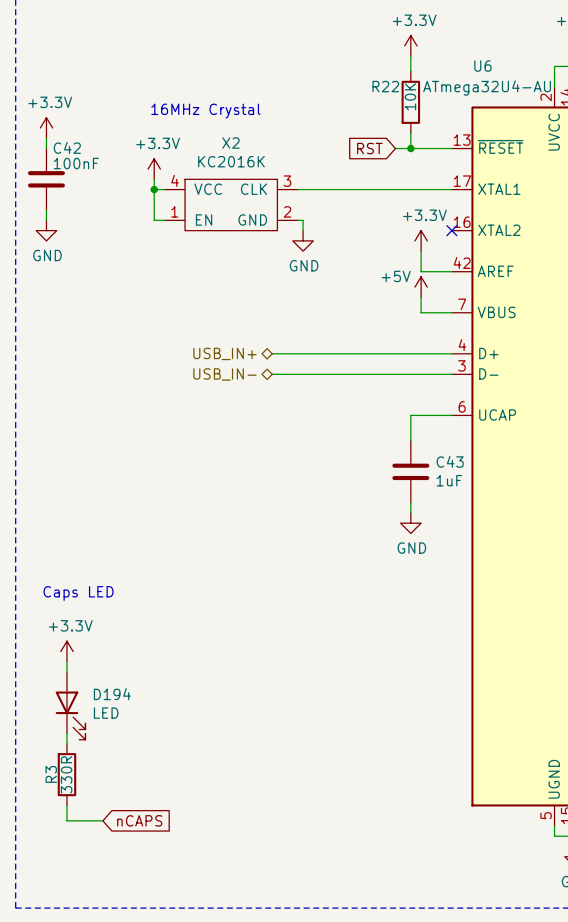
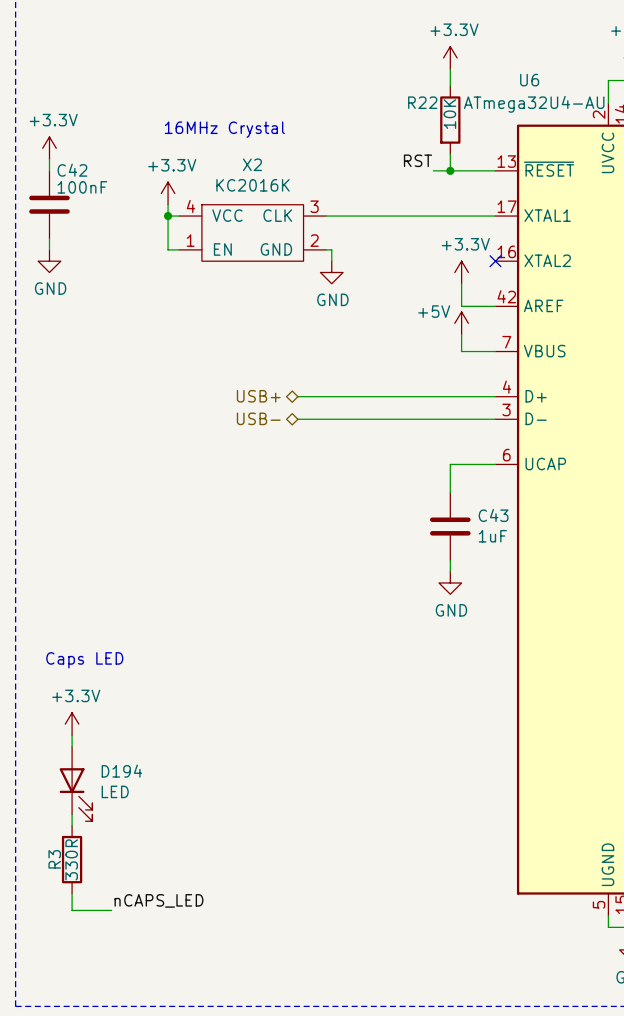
label: none -> RST (417, 160)
global label: RST (369, 148) -> none
hierarchical label: USB_IN+ (224, 353) -> USB+ (258, 396)
hierarchical label: USB_IN- (224, 374) -> USB- (258, 418)
label: none -> nCAPS_LED (158, 900)
global label: nCAPS (139, 820) -> none

